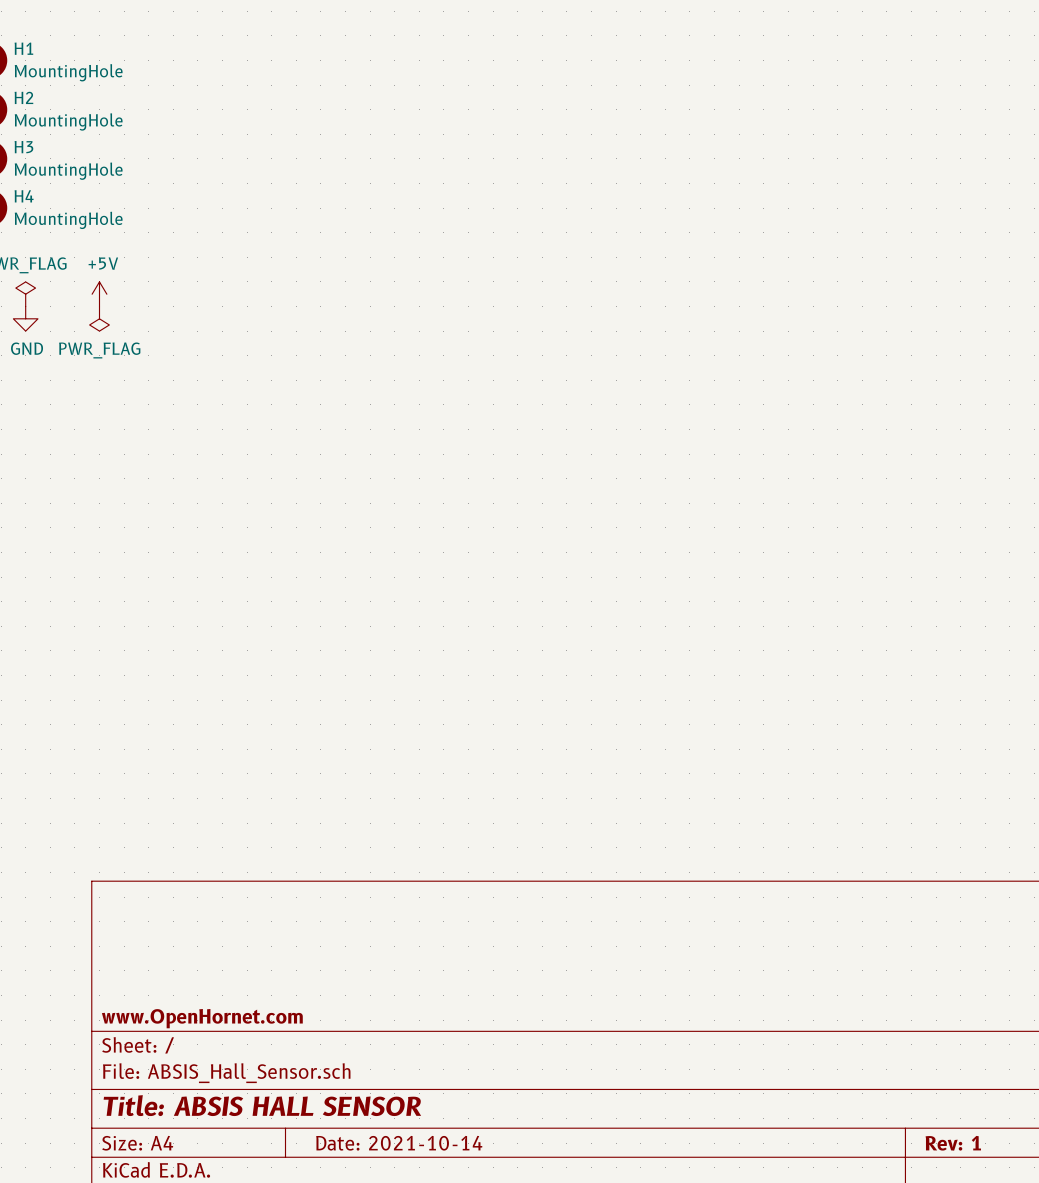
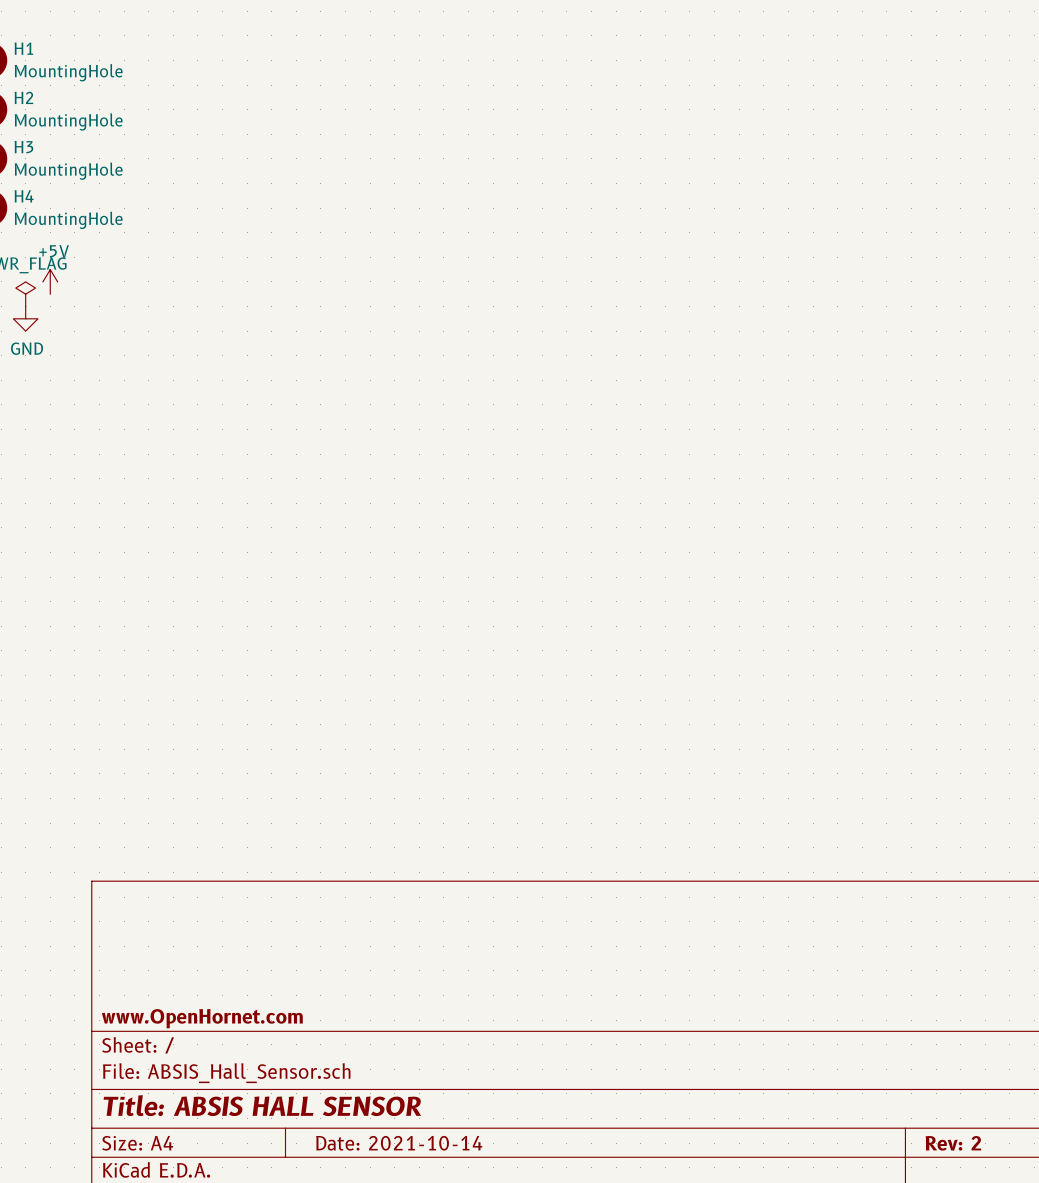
power symbol position: +5V (99, 294) -> +5V (50, 281)
power symbol: PWR_FLAG (99, 318) -> none
title block: Rev: 1 (953, 1143) -> Rev: 2 (953, 1143)

